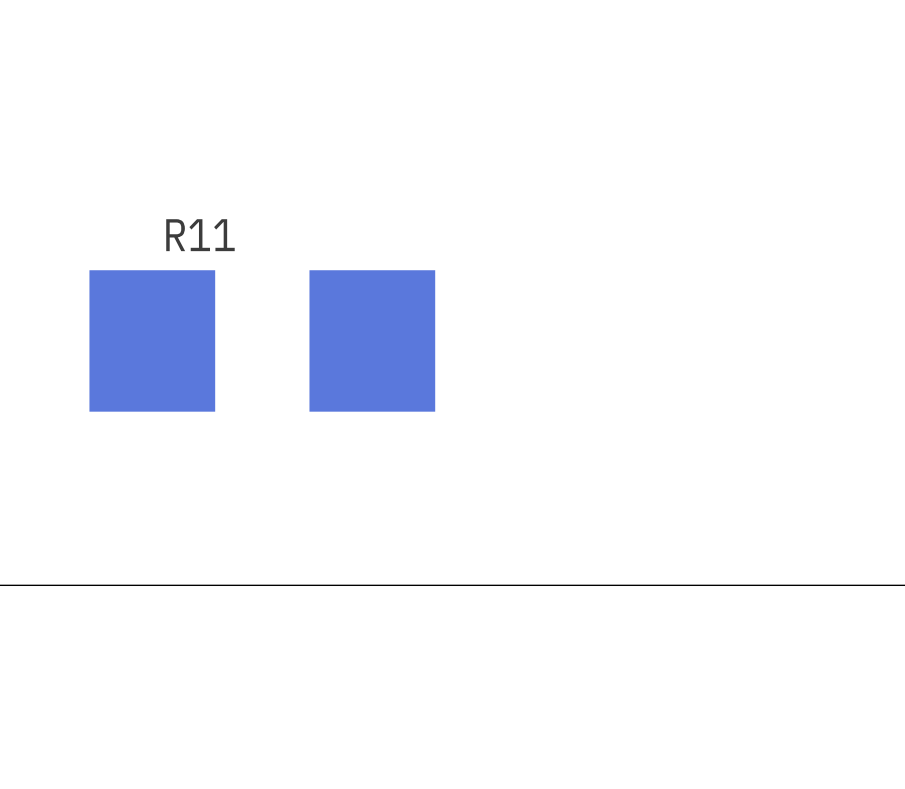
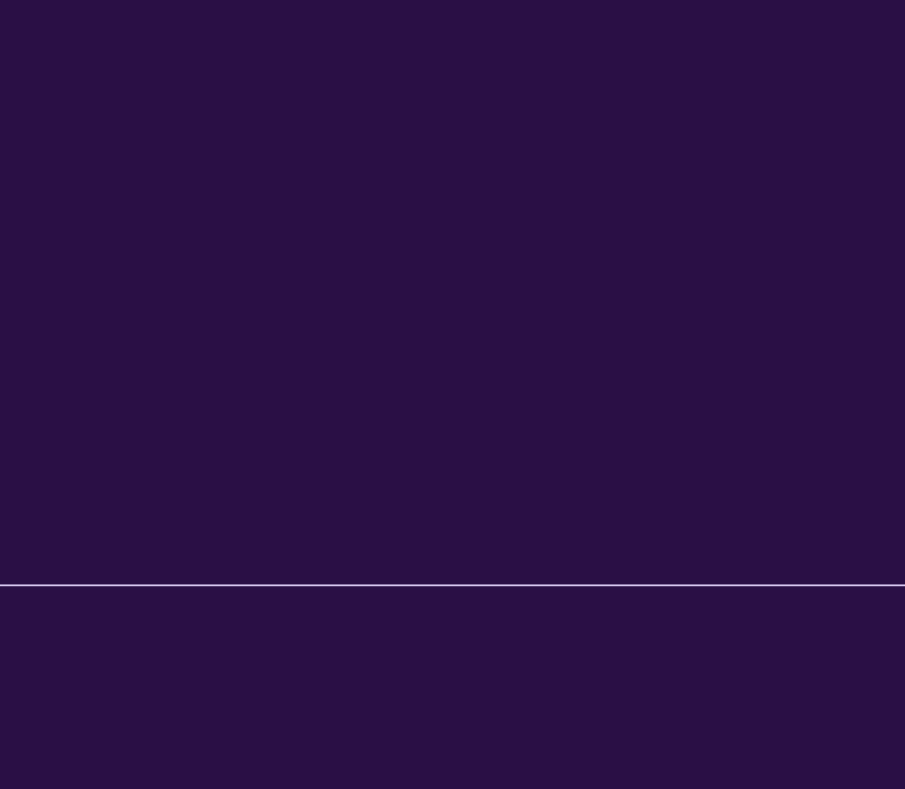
R11: (262, 340) -> none

